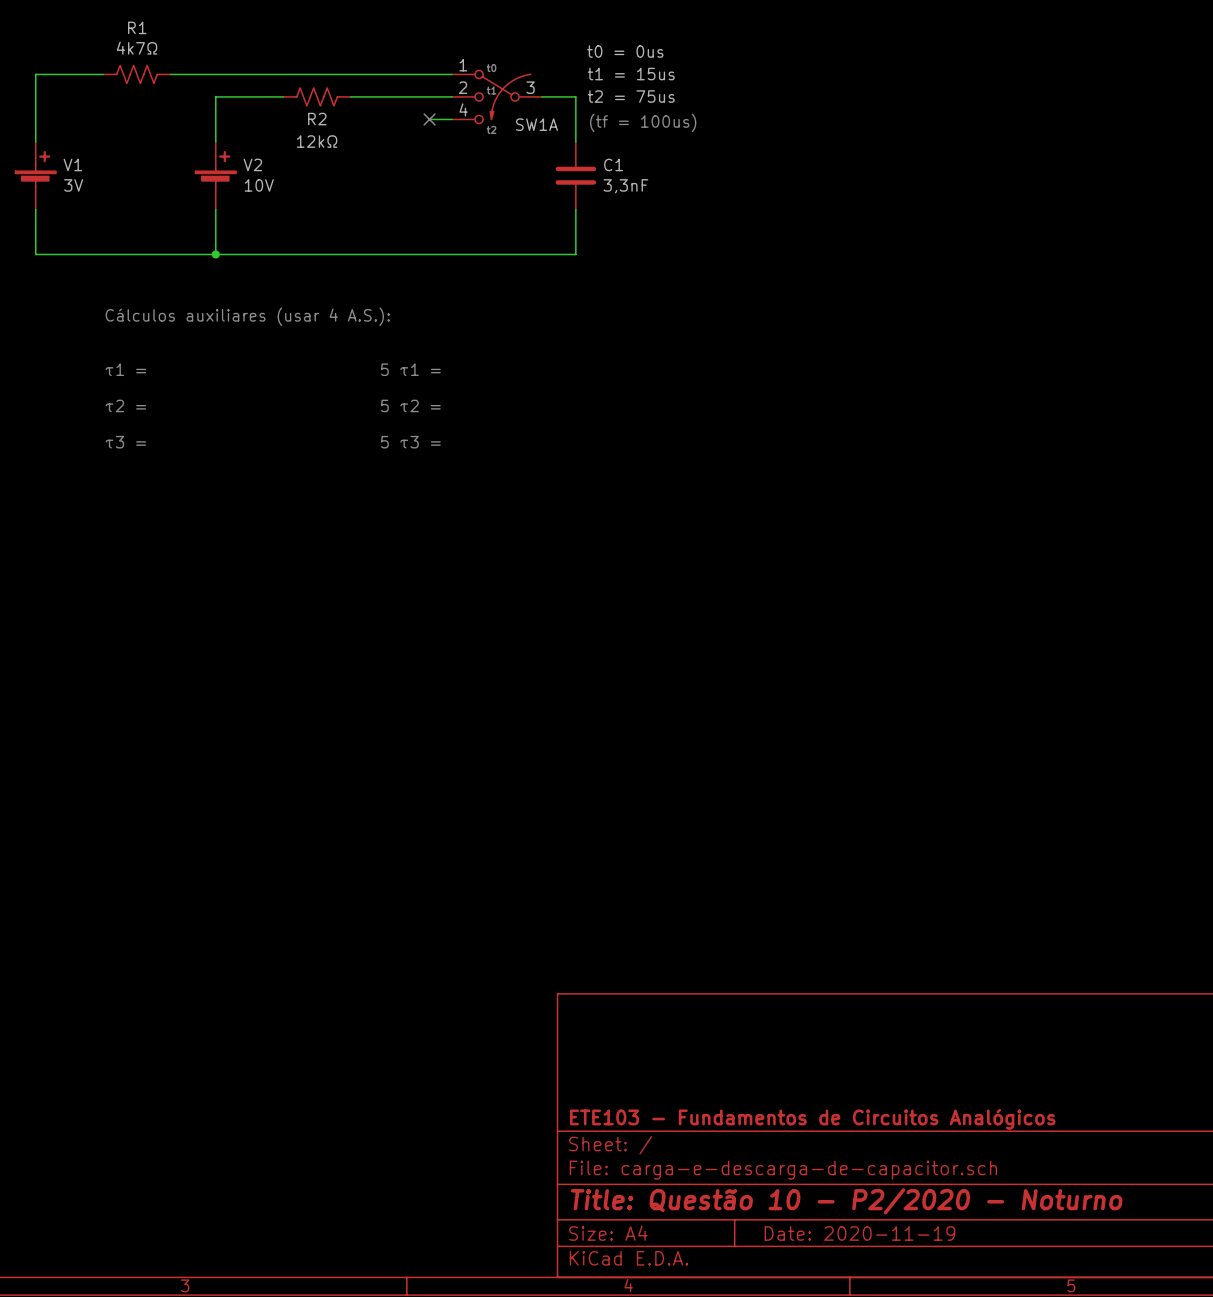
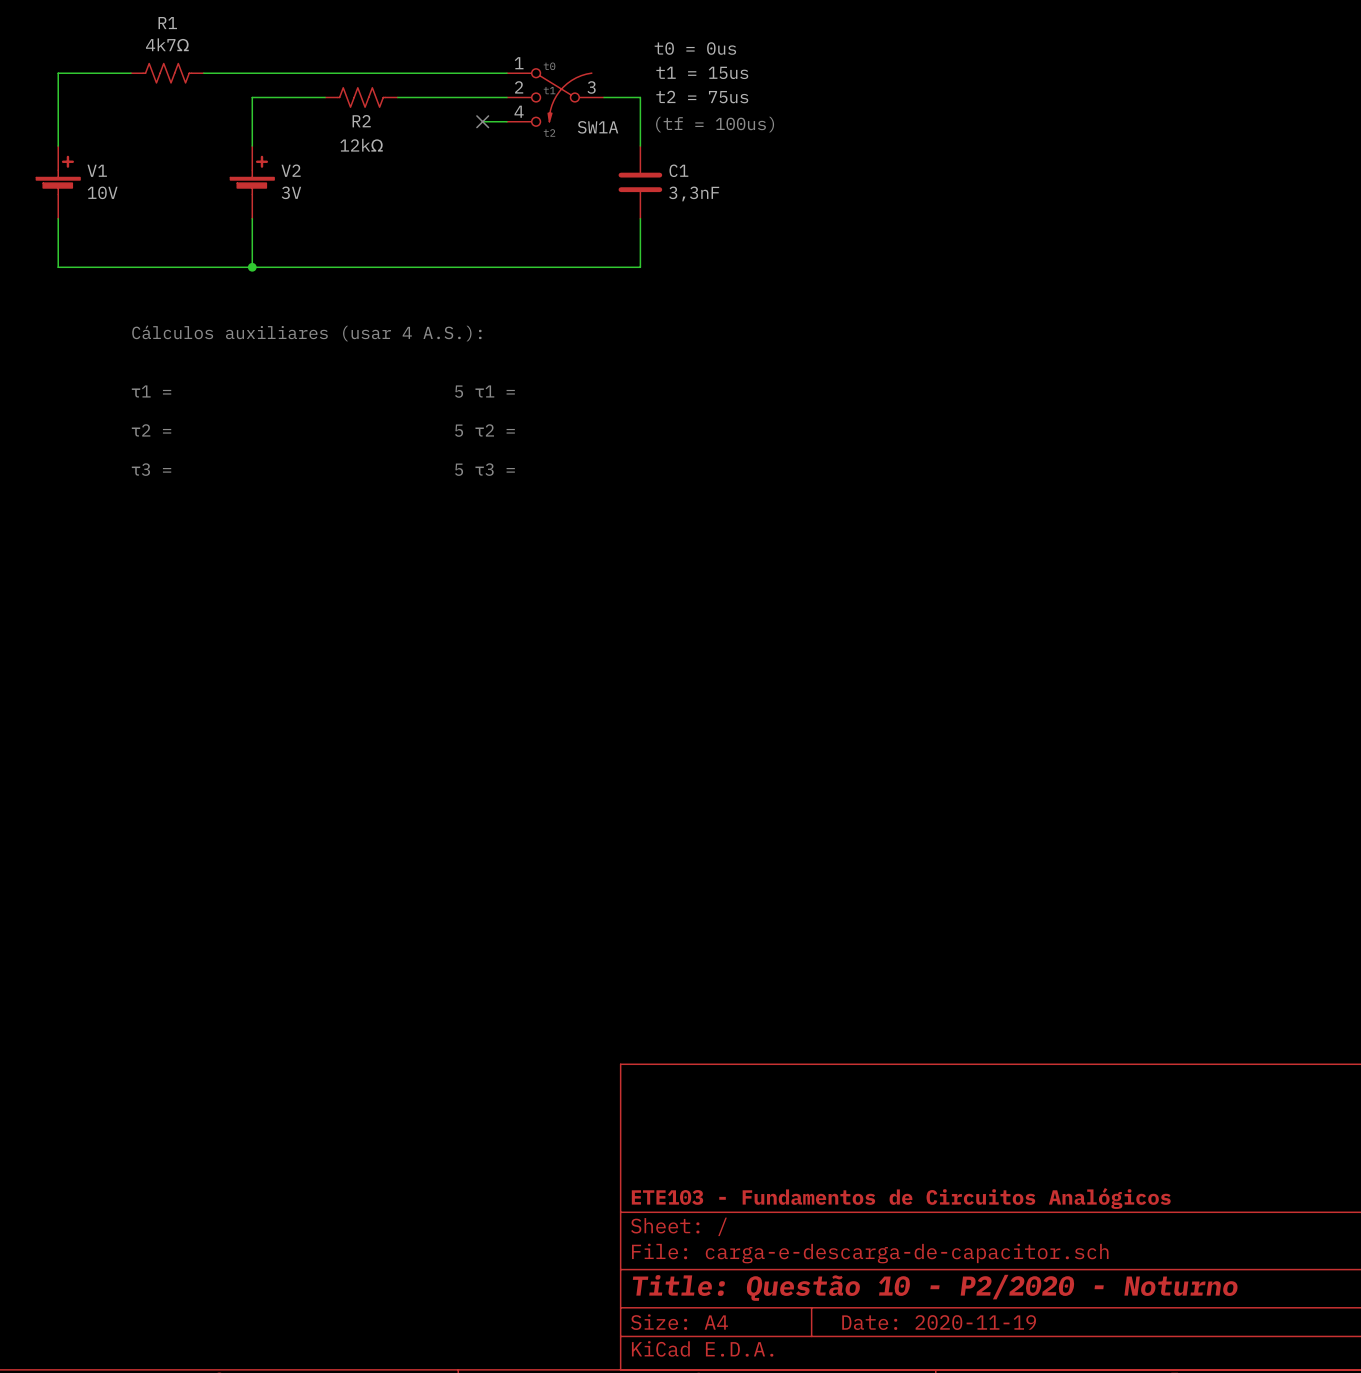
V1 value: 3V (73, 185) -> 10V (102, 192)
V2 value: 10V (259, 185) -> 3V (291, 192)

